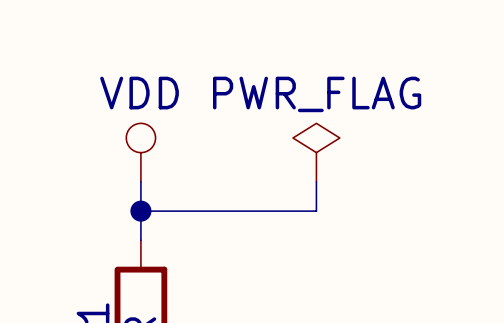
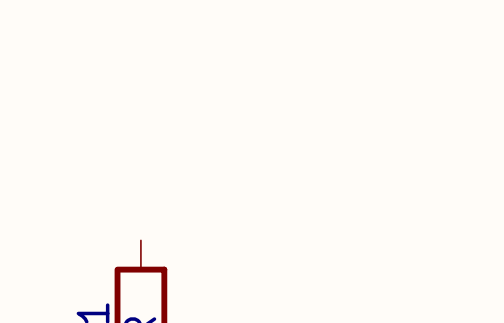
power symbol: VDD (140, 152) -> none
power symbol: PWR_FLAG (316, 152) -> none
wire: (140, 181) (140, 240) -> none
wire: (316, 181) (316, 211) (140, 211) -> none
junction: (140, 211) -> none

